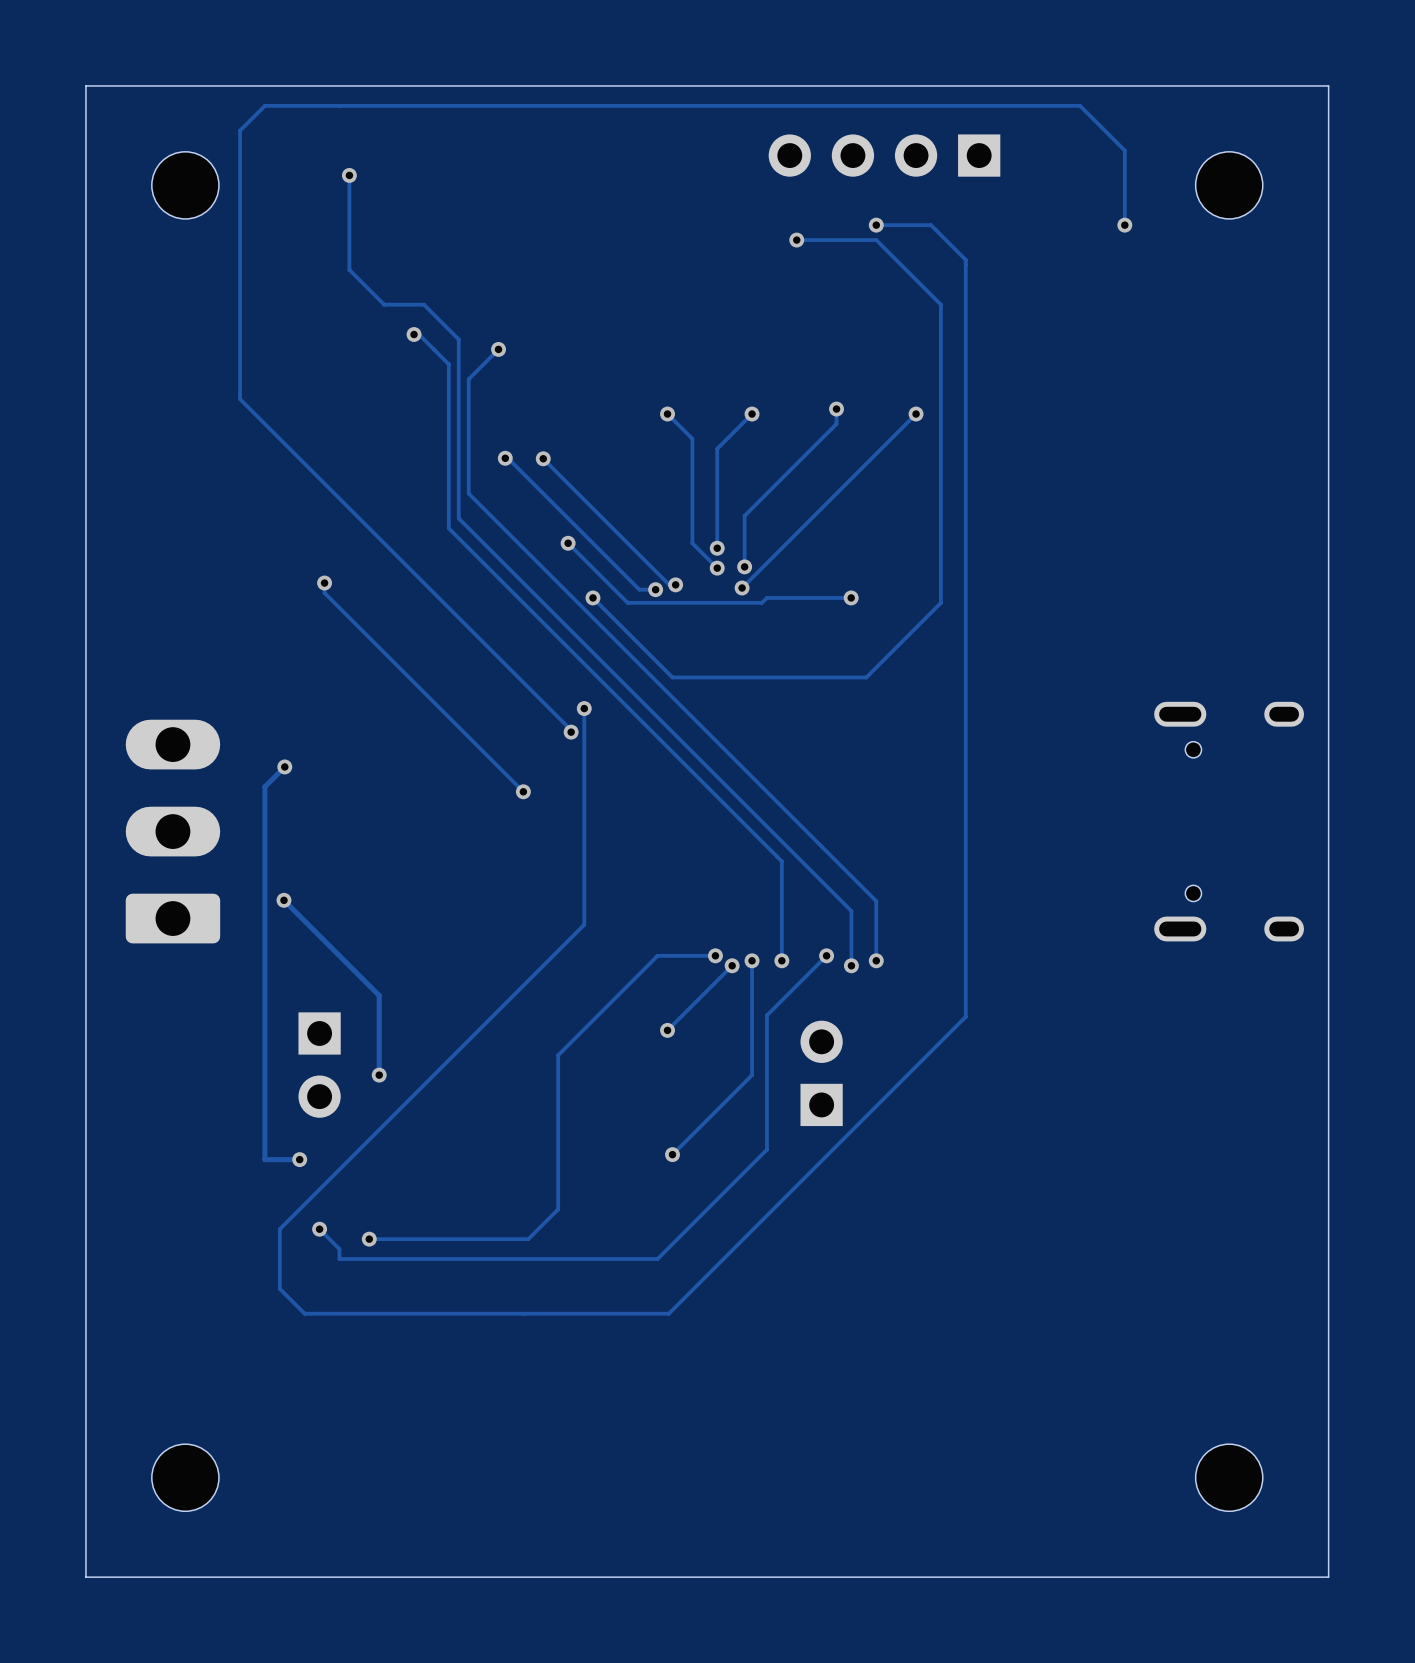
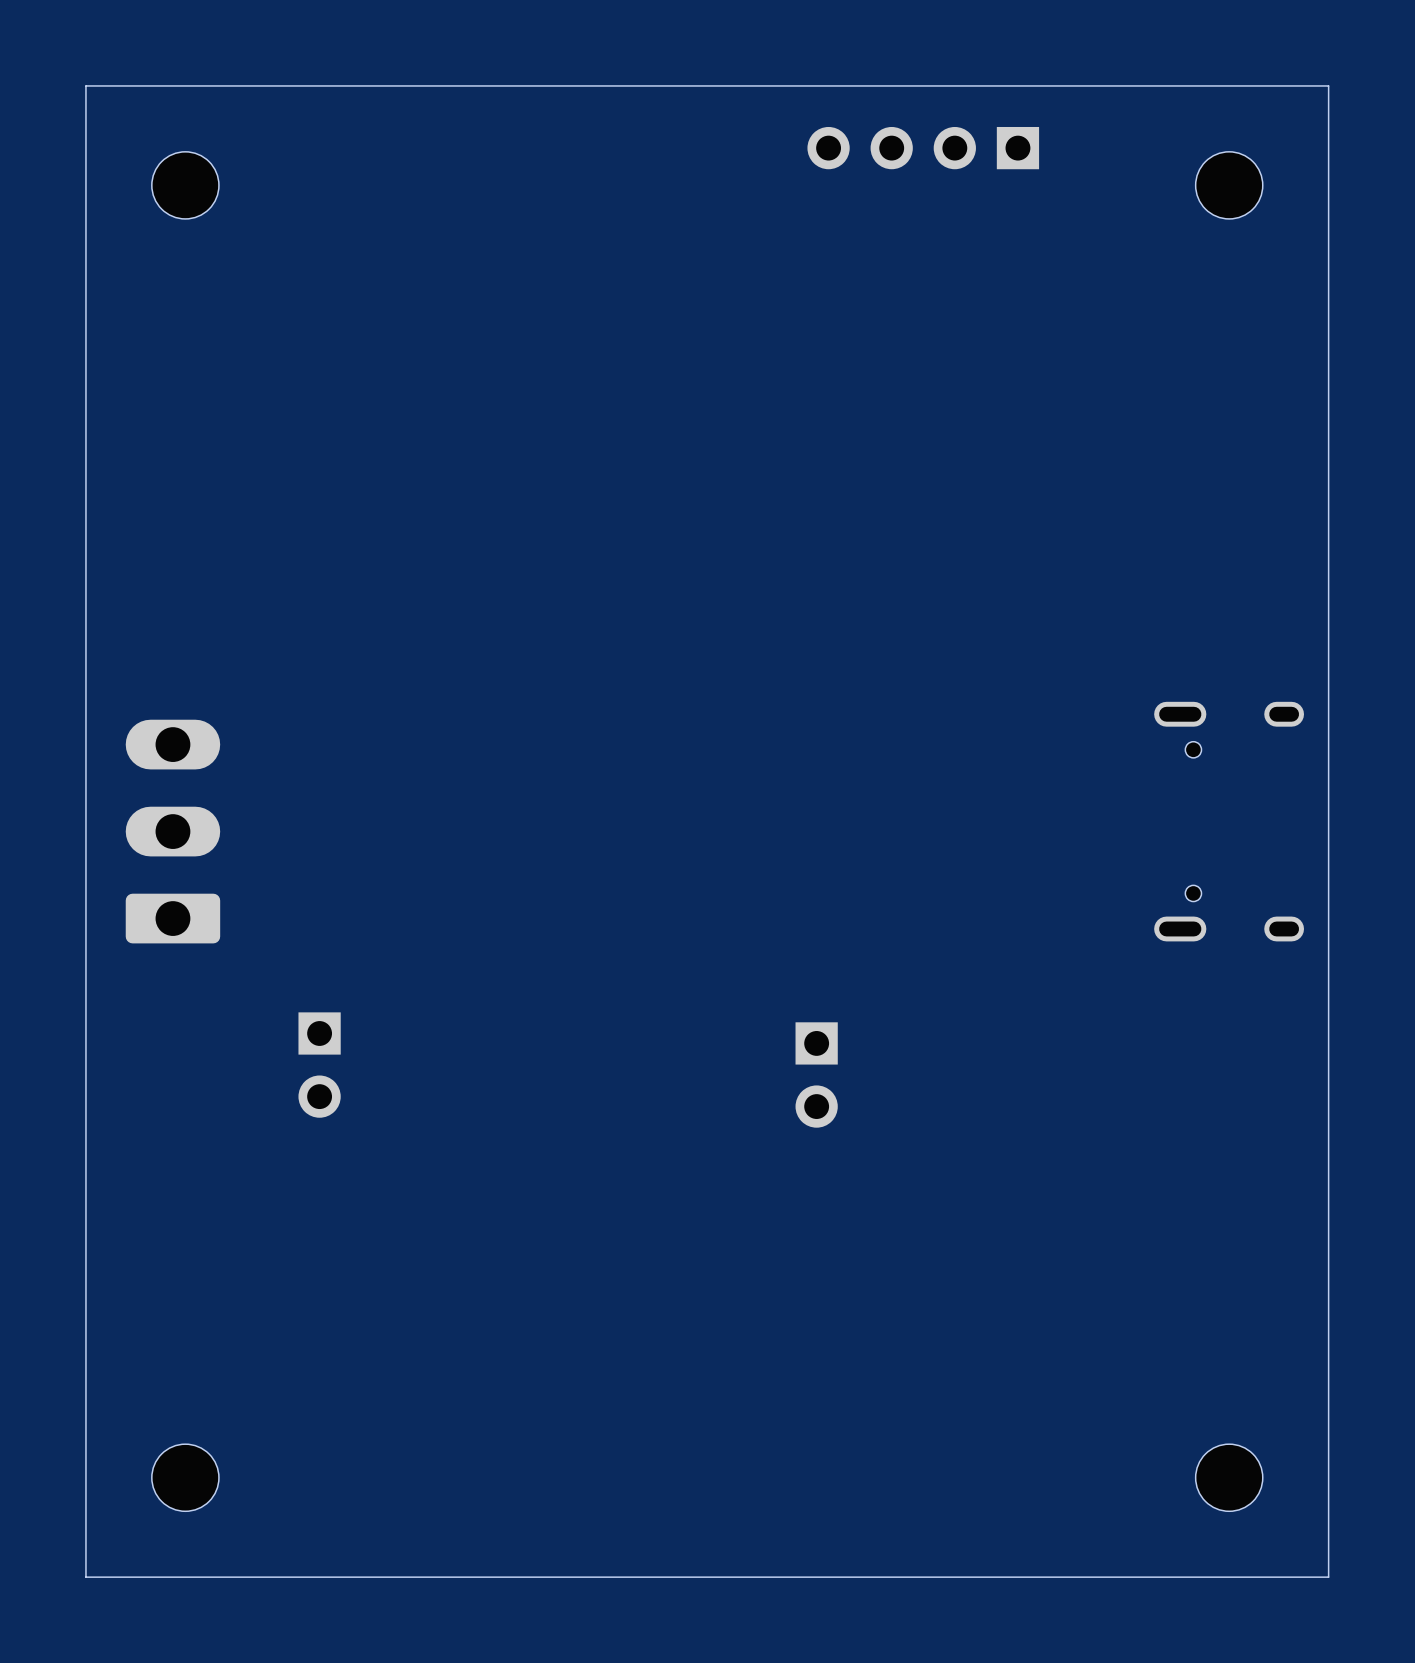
part position: (884, 155) -> (923, 148)
track: (349, 175) (349, 269) (384, 304) (423, 304) (458, 339) (458, 518) (851, 911) (851, 965) (856, 965) -> none
via: (349, 175) -> none
track: (876, 225) (930, 225) (965, 259) (965, 1016) (668, 1313) (304, 1313) (279, 1288) (279, 1229) (584, 924) (584, 708) -> none
via: (876, 225) -> none
track: (1124, 225) (1124, 150) (1080, 105) (264, 105) (240, 130) (240, 399) (571, 732) (576, 732) -> none
via: (1124, 225) -> none
track: (796, 240) (876, 240) (940, 304) (940, 602) (866, 677) (672, 677) (592, 597) -> none
via: (796, 240) -> none
track: (414, 334) (419, 334) (448, 364) (448, 528) (781, 861) (781, 960) -> none
via: (414, 334) -> none
track: (498, 344) (498, 349) (468, 379) (468, 493) (876, 901) (876, 960) -> none
via: (498, 349) -> none
track: (836, 409) (836, 423) (744, 515) (744, 566) -> none
via: (836, 409) -> none
track: (667, 414) (692, 438) (692, 543) (717, 568) -> none
via: (667, 414) -> none
track: (752, 414) (717, 448) (717, 548) -> none
via: (752, 414) -> none
via: (916, 414) -> none
track: (921, 414) (916, 414) (742, 588) -> none
track: (505, 458) (507, 458) (639, 589) (655, 589) -> none
via: (505, 458) -> none
track: (543, 458) (669, 584) (675, 584) -> none
via: (543, 458) -> none
track: (568, 543) (627, 602) (762, 602) (766, 597) (851, 597) -> none
via: (568, 543) -> none
via: (717, 548) -> none
via: (744, 566) -> none
via: (717, 568) -> none
track: (324, 583) (324, 592) (523, 791) -> none
via: (324, 583) -> none
via: (675, 584) -> none
via: (742, 588) -> none
via: (655, 589) -> none
via: (592, 597) -> none
via: (851, 597) -> none
via: (584, 708) -> none
via: (571, 732) -> none
track: (284, 766) (264, 786) (264, 1159) (299, 1159) -> none
via: (284, 766) -> none
via: (523, 791) -> none
track: (283, 900) (379, 995) (379, 1075) -> none
via: (283, 900) -> none
track: (715, 955) (657, 955) (558, 1055) (558, 1209) (528, 1239) (369, 1239) -> none
via: (715, 955) -> none
track: (826, 955) (766, 1015) (766, 1149) (657, 1259) (339, 1259) (339, 1249) (319, 1229) -> none
via: (826, 955) -> none
track: (752, 960) (752, 1075) (672, 1154) -> none
via: (752, 960) -> none
via: (781, 960) -> none
via: (876, 960) -> none
track: (732, 965) (667, 1030) -> none
via: (732, 965) -> none
via: (851, 965) -> none
via: (667, 1030) -> none
part rotation: 0° (821, 1073) -> 180° (816, 1074)
via: (379, 1075) -> none
via: (672, 1154) -> none
via: (299, 1159) -> none
via: (319, 1229) -> none
via: (369, 1239) -> none

